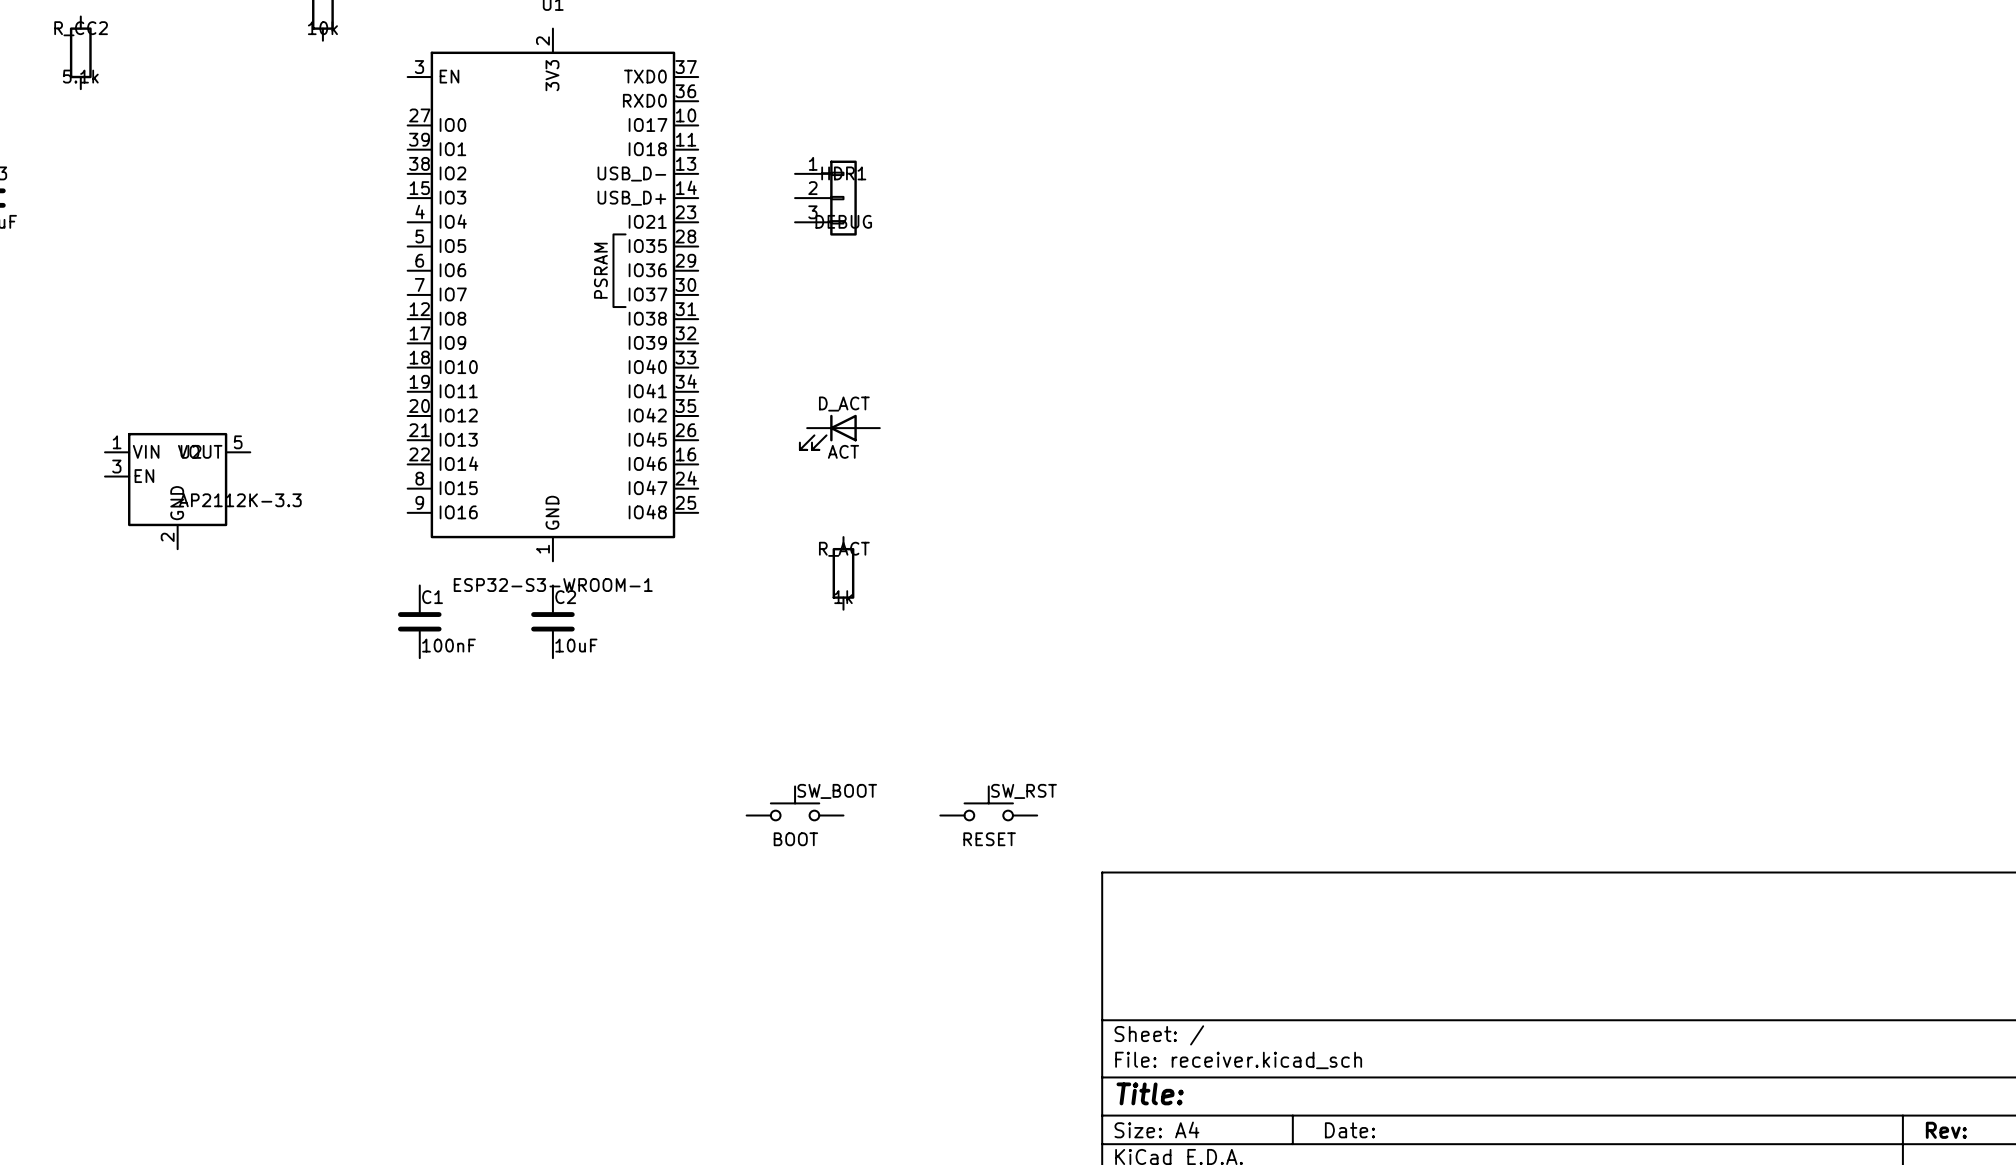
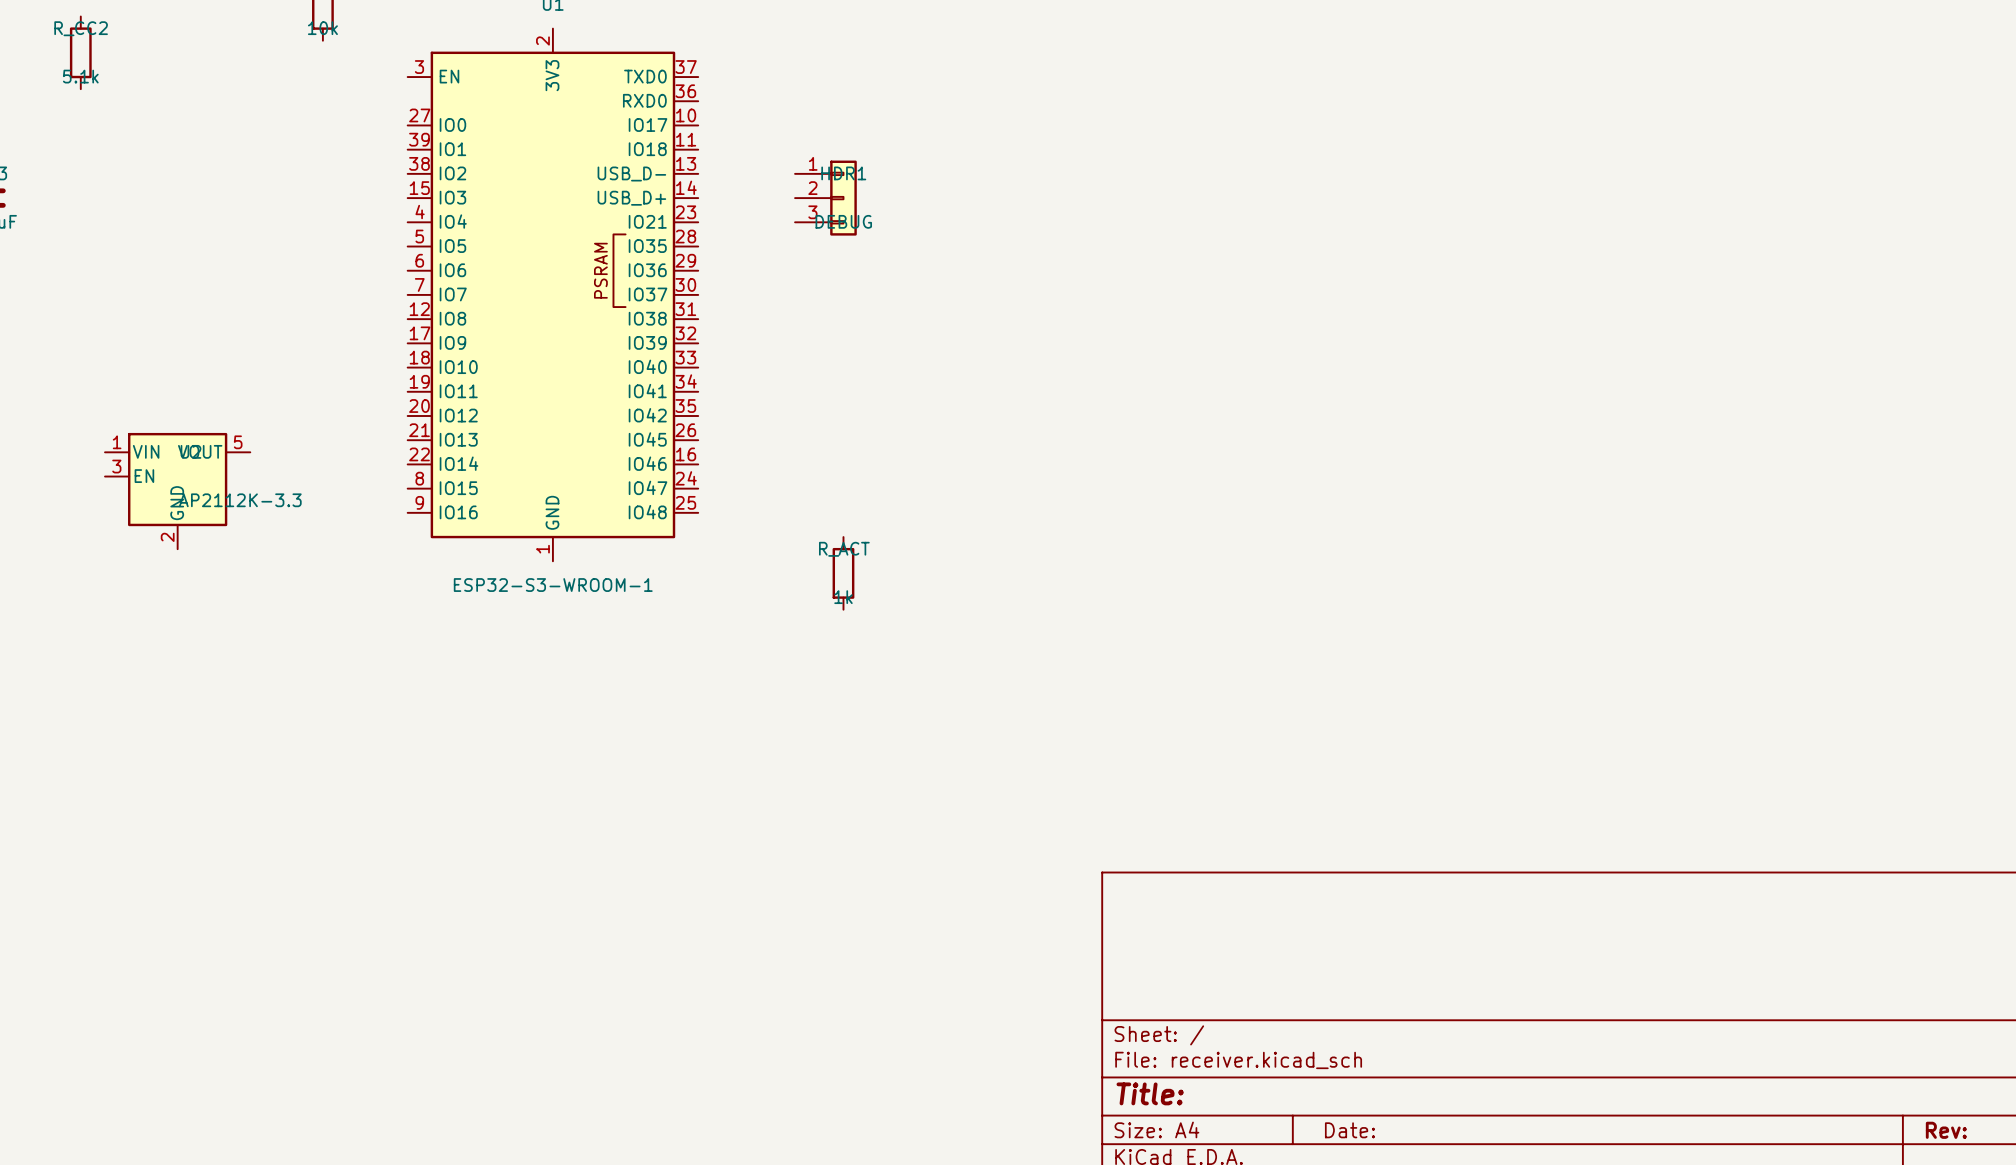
D_ACT: ACT (839, 432) -> none
C1: 100nF (419, 621) -> none
C2: 10uF (552, 621) -> none
SW_BOOT: BOOT (795, 803) -> none
SW_RST: RESET (988, 803) -> none

